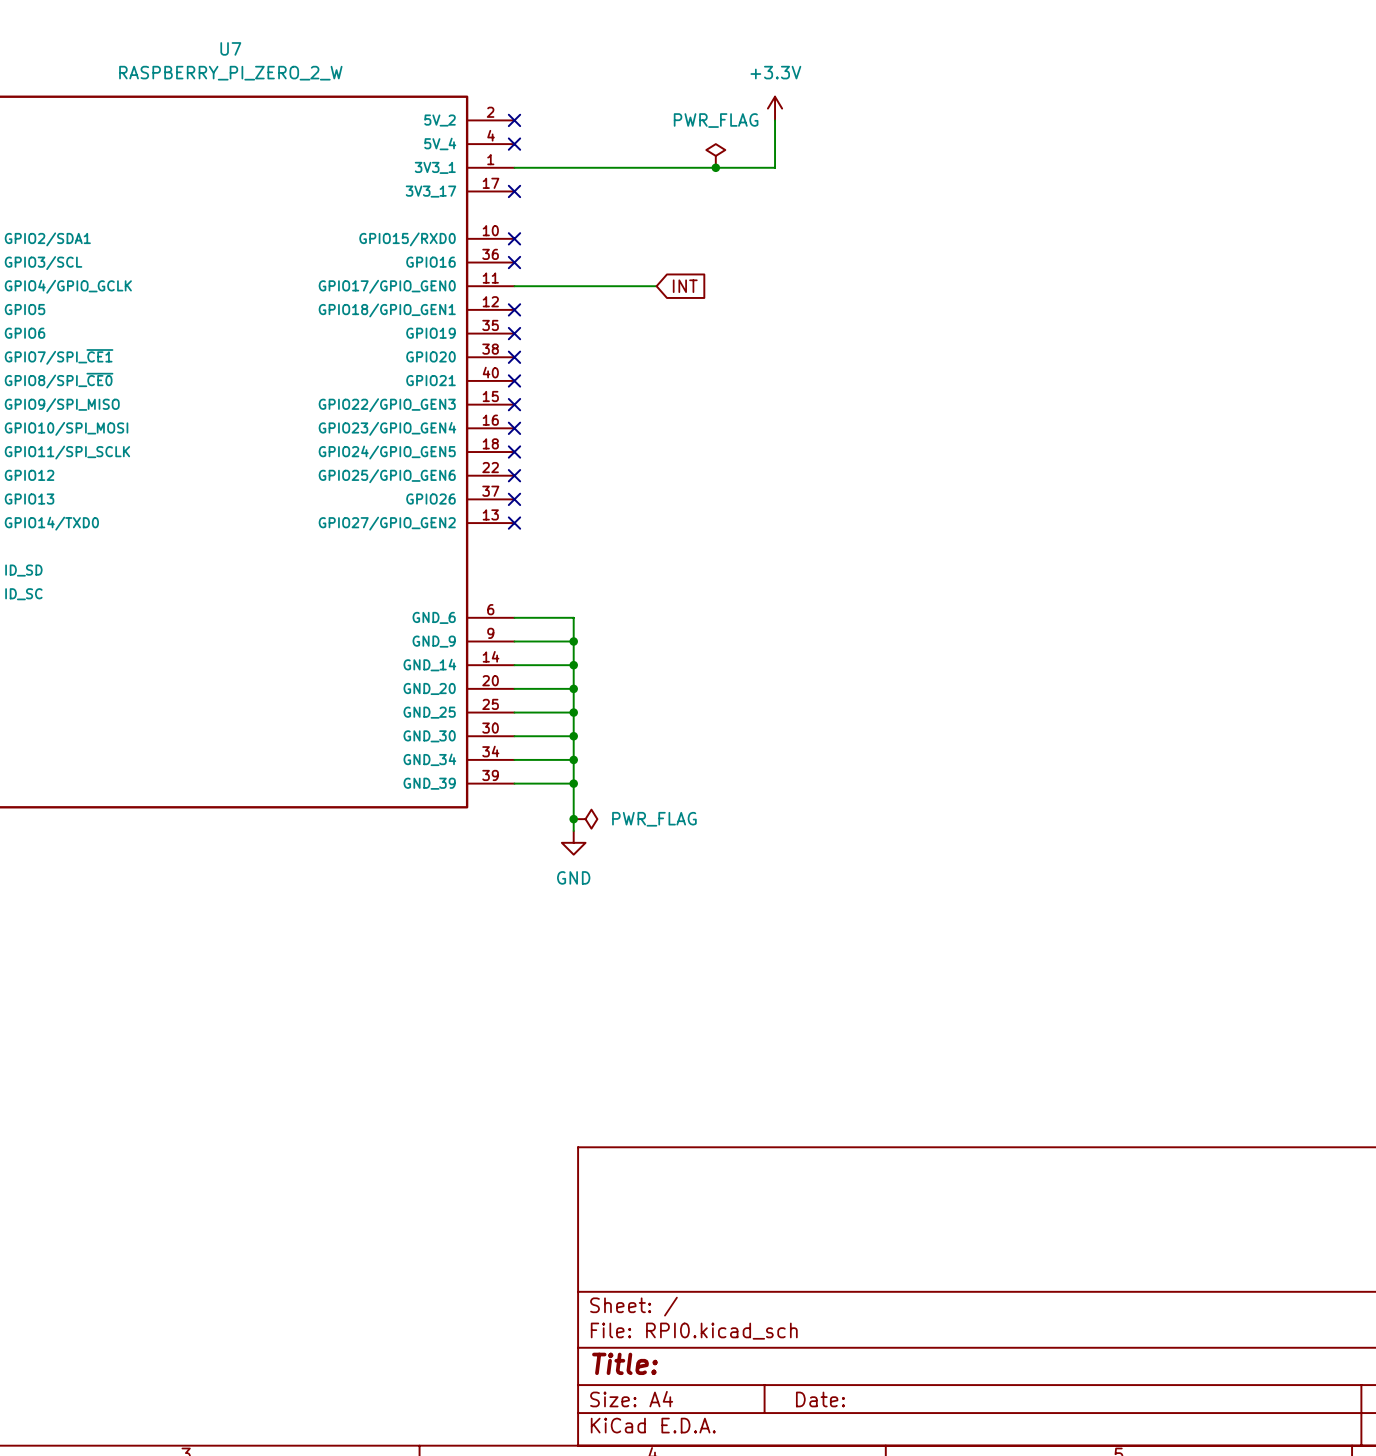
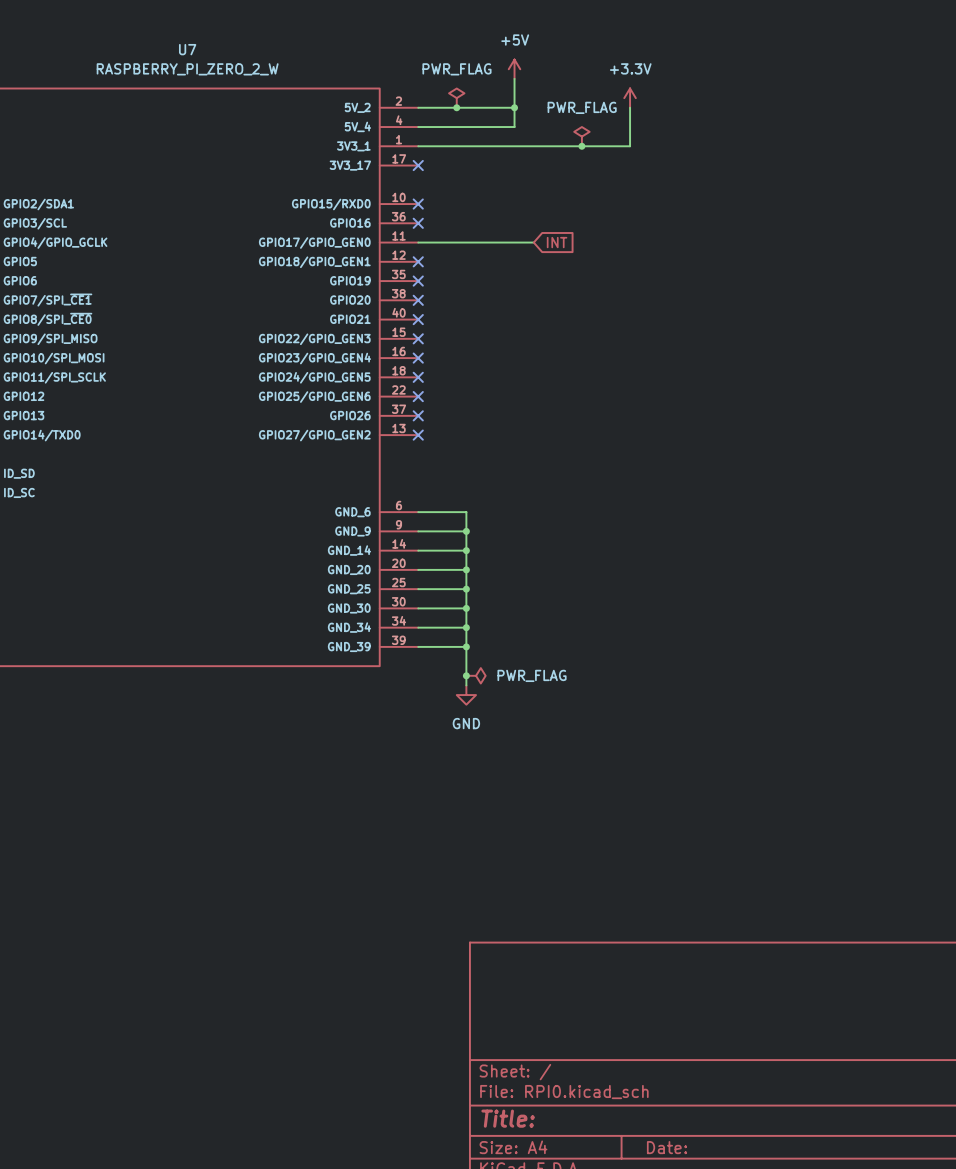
power symbol: none -> +5V (514, 69)
wire: none -> (514, 78) (514, 127) (418, 127)
power symbol: none -> PWR_FLAG (456, 98)
wire: none -> (418, 107) (514, 107)
no-connect mark: (514, 120) -> none
junction: none -> (456, 107)
junction: none -> (514, 107)
no-connect mark: (514, 144) -> none

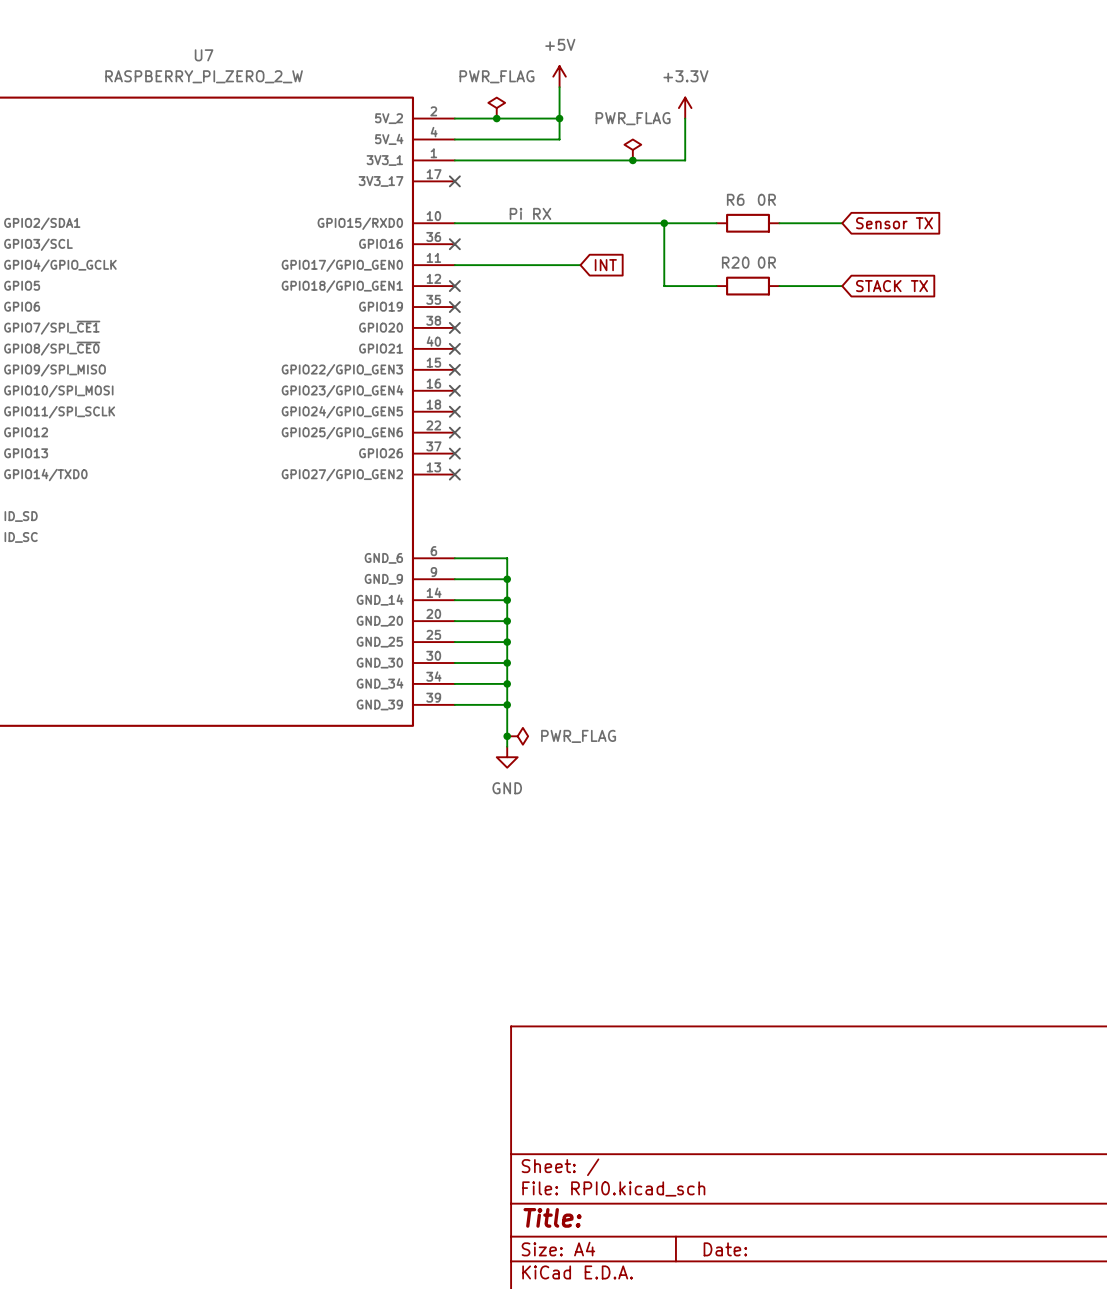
label: none -> Pi RX (530, 213)
wire: none -> (454, 223) (716, 223)
no-connect mark: (418, 204) -> none
wire: none -> (664, 223) (664, 286) (716, 286)
junction: none -> (664, 223)
R6: none -> 0R (748, 223)
wire: none -> (779, 223) (842, 223)
global label: none -> Sensor TX (894, 223)
R20: none -> 0R (748, 286)
wire: none -> (779, 286) (842, 286)
global label: none -> STACK TX (892, 286)

